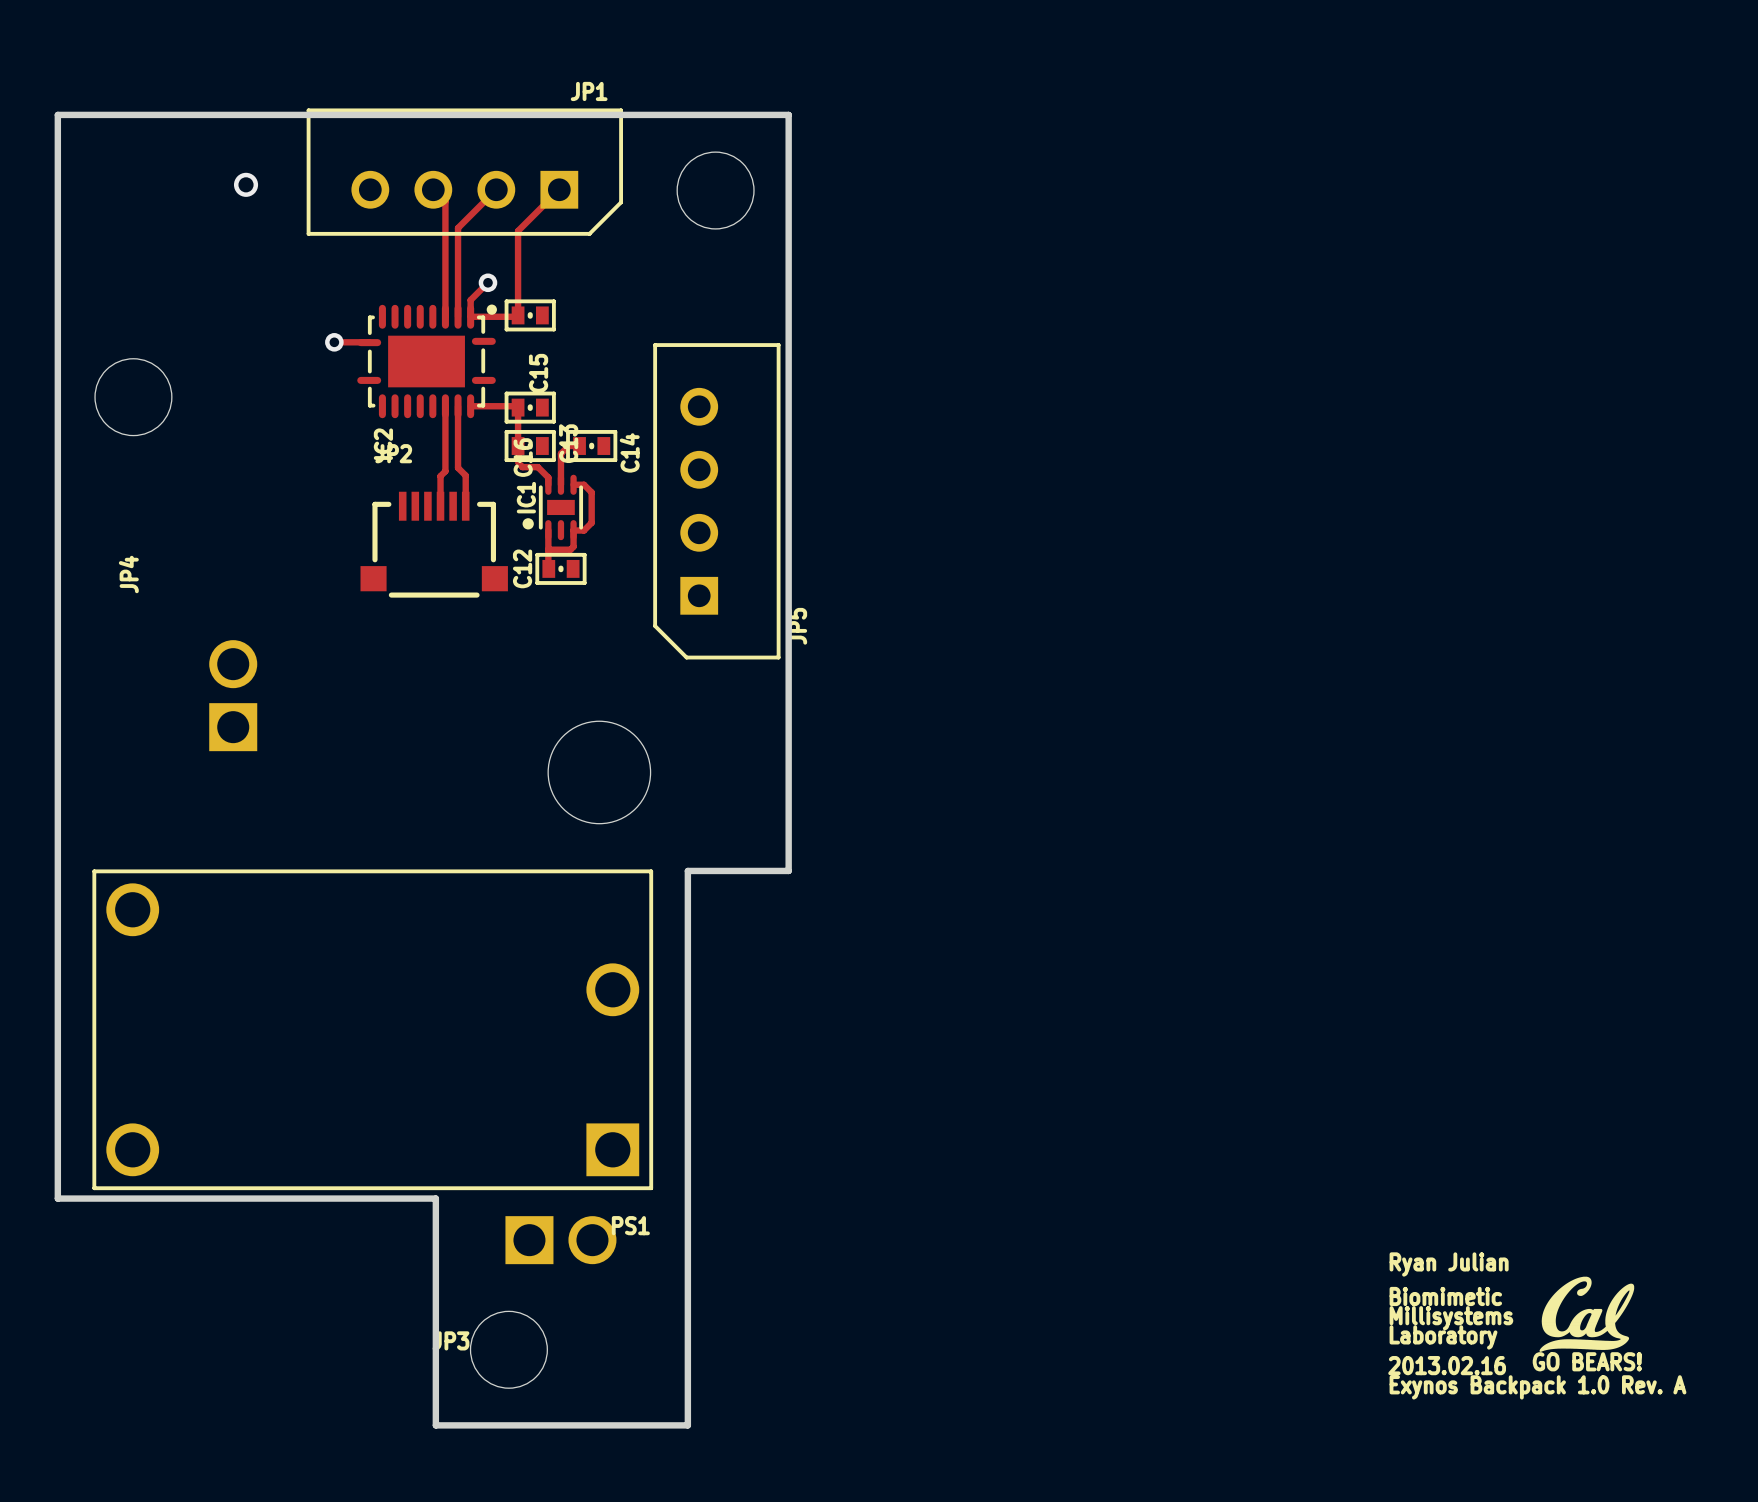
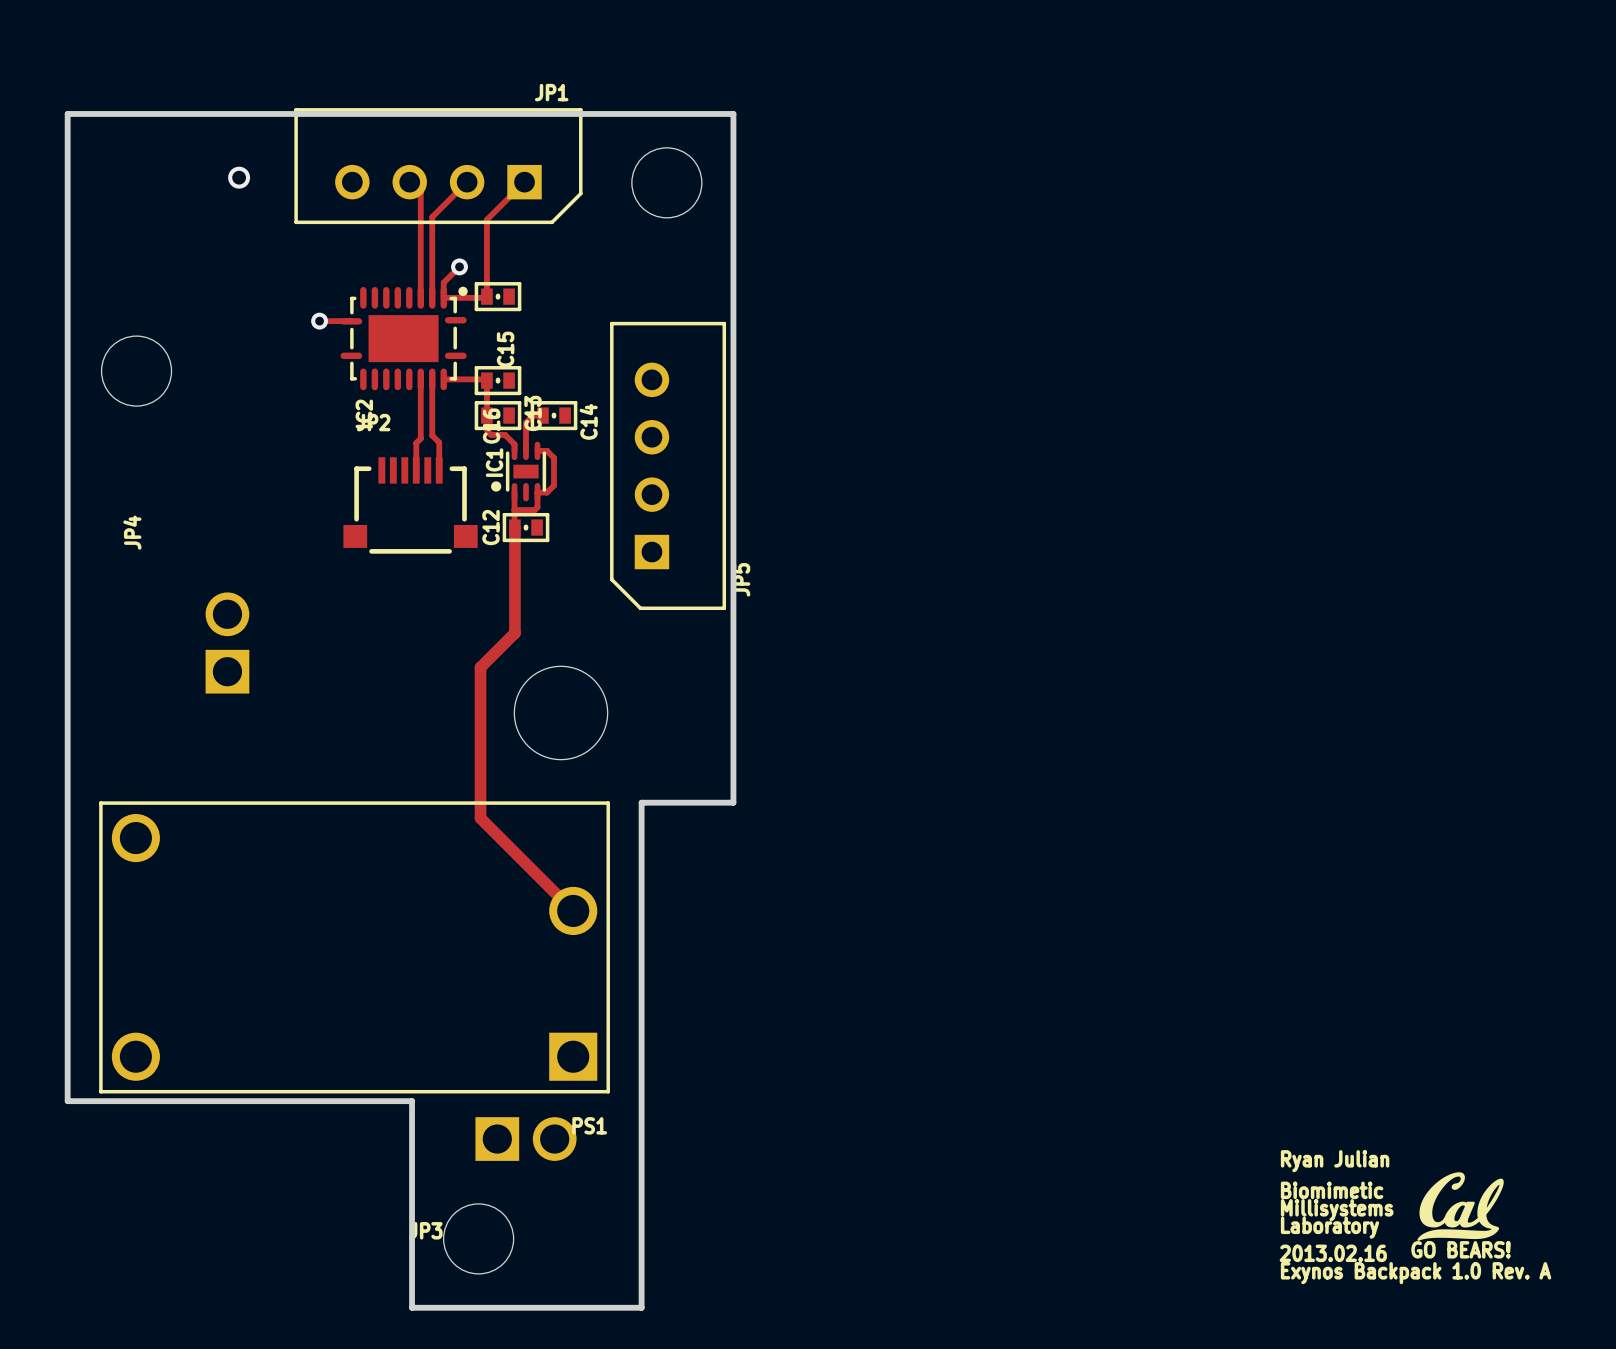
track: none -> (514, 527) (514, 633) (480, 667) (480, 818) (573, 910)

